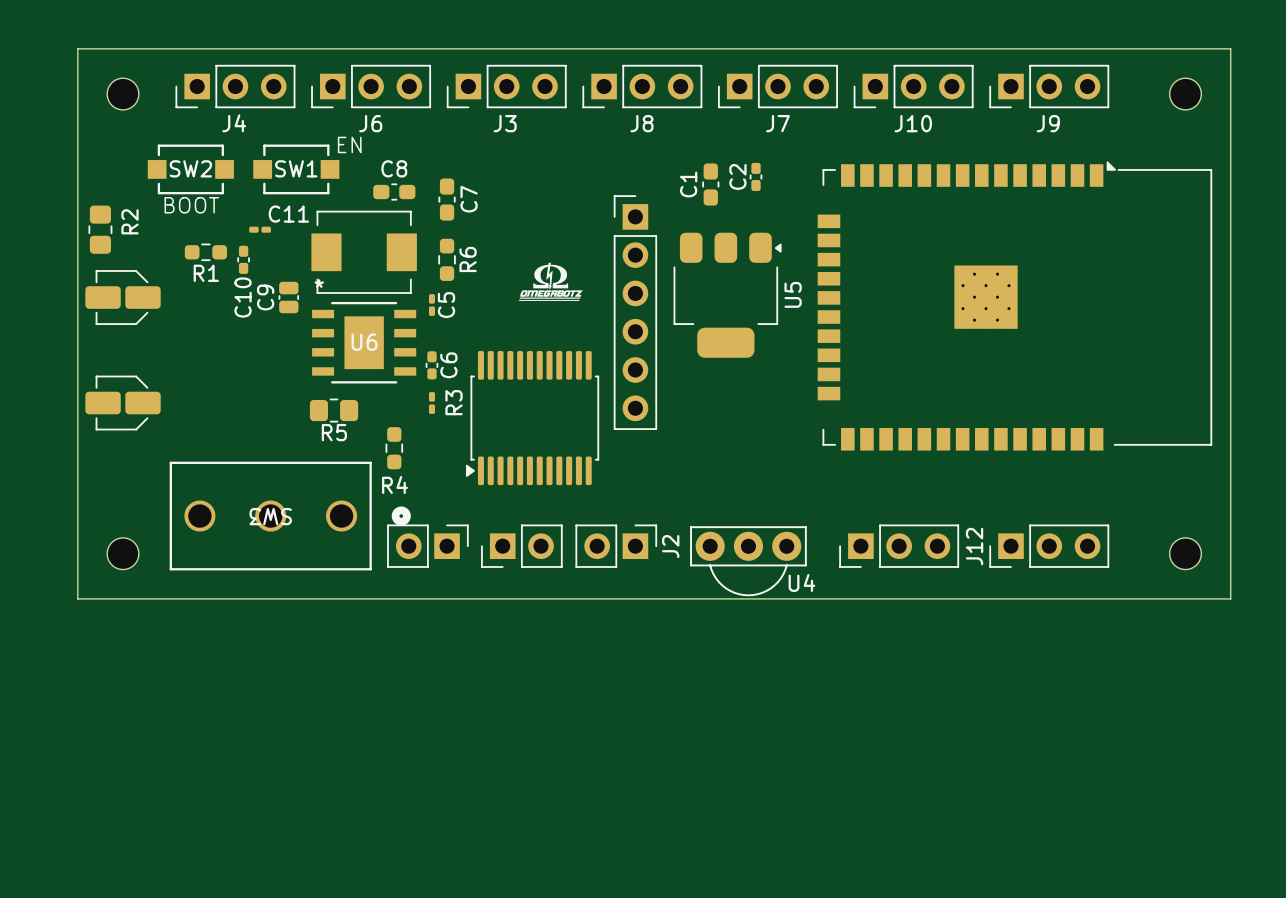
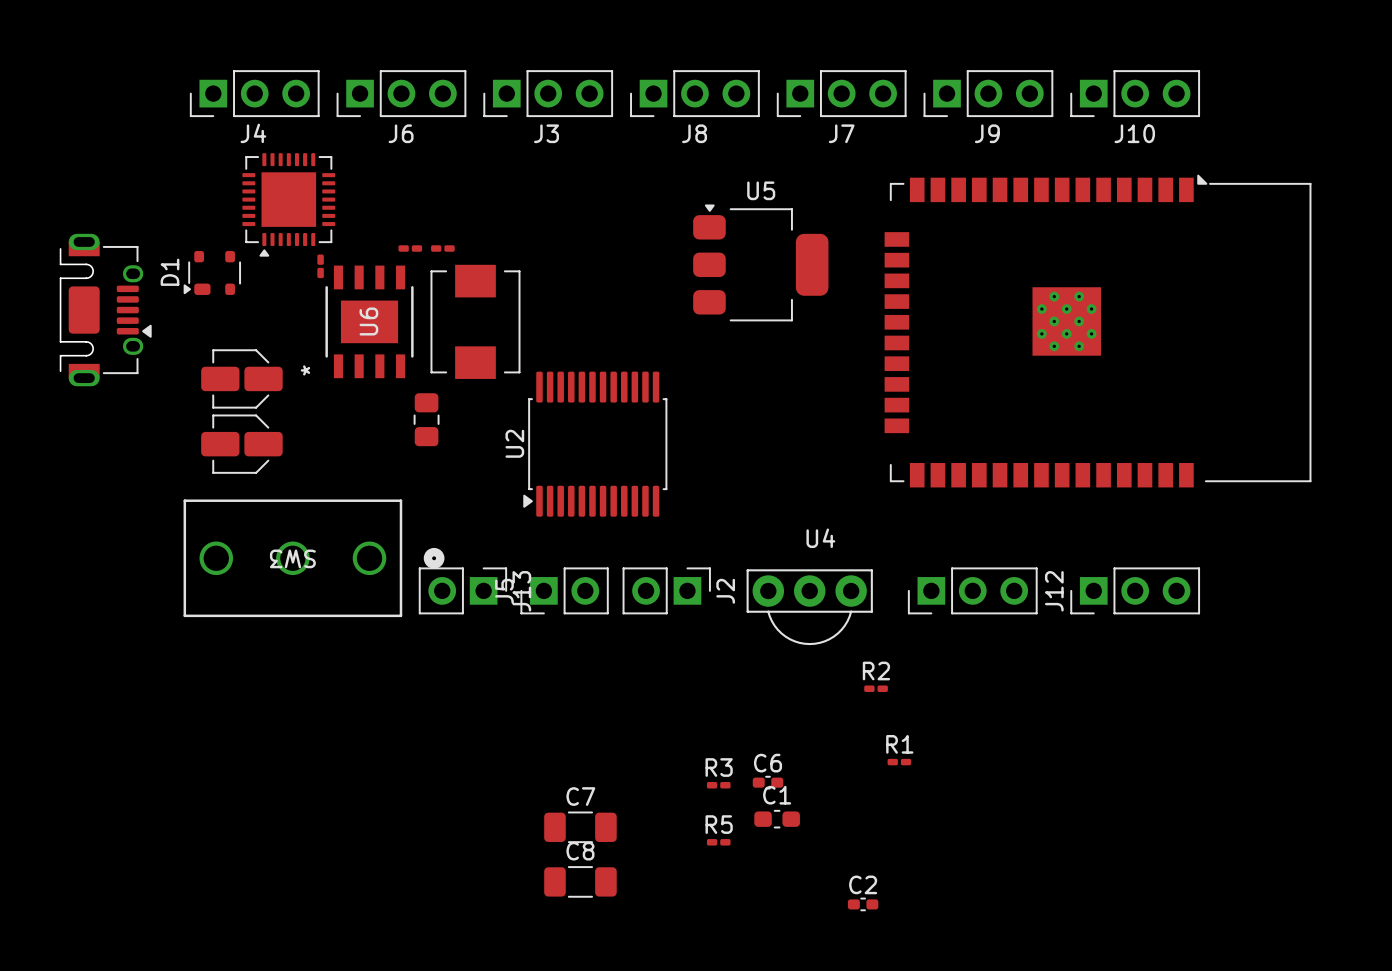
board edge: (77, 48) (1230, 48) (1230, 598) (77, 598) (77, 48) -> none
part: (123, 94) -> none
part: (1185, 94) -> none
J10 name: J10 (913, 123) -> J9 (987, 133)
J9 name: J9 (1048, 123) -> J10 (1134, 133)
text: EN (349, 144) -> none
SW2: (190, 169) -> none
SW1: (296, 169) -> none
C2 rotation: 0° (755, 176) -> 90° clockwise (863, 904)
C2 position: (755, 176) -> (863, 904)
C7 footprint: [438, 178, 456, 221] -> [544, 811, 617, 844]
C8 footprint: [373, 183, 416, 201] -> [544, 866, 617, 898]
C1 rotation: 0° (710, 184) -> 90° clockwise (777, 819)
C1 position: (710, 184) -> (777, 819)
part: none -> (288, 204)
C7 name position: C7 (469, 199) -> C7 (580, 796)
R2 footprint: [88, 205, 113, 254] -> [864, 685, 888, 692]
text: BOOT (191, 205) -> none
R2 name position: R2 (130, 221) -> R2 (876, 670)
C11: (260, 229) -> none
part: none -> (410, 248)
part: none -> (442, 248)
R1 footprint: [184, 243, 228, 262] -> [887, 758, 912, 766]
part: none -> (320, 266)
D1: none -> (212, 272)
part rotation: 0° (364, 252) -> 90° clockwise (475, 321)
part position: (364, 252) -> (475, 321)
C10: (243, 259) -> none
R6: (447, 259) -> none
drawing: [518, 262, 583, 301] -> none
R1 name position: R1 (206, 273) -> R1 (899, 744)
part: none -> (105, 310)
U5 rotation: 0° (727, 295) -> 90° counterclockwise (760, 262)
part: (123, 297) -> none
C9: (288, 297) -> none
C5: (431, 305) -> none
part: (635, 312) -> none
U6 rotation: 0° (364, 342) -> 90° counterclockwise (369, 321)
part: none -> (241, 378)
C6 rotation: 0° (431, 365) -> 90° clockwise (767, 782)
C6 position: (431, 365) -> (767, 782)
part: none -> (426, 419)
R5 footprint: [309, 398, 359, 423] -> [706, 839, 731, 846]
part: (123, 403) -> none
R3 rotation: 0° (431, 403) -> 90° clockwise (718, 785)
R3 position: (431, 403) -> (718, 785)
part: none -> (241, 444)
U2: none -> (595, 444)
part: (532, 418) -> none
R5 name position: R5 (334, 432) -> R5 (719, 824)
R4: (394, 448) -> none
J5 name: none -> J5 (504, 591)
J13 name: none -> J13 (521, 591)
part: (123, 553) -> none
part: (1185, 553) -> none
U4 name position: U4 (801, 582) -> U4 (820, 538)

